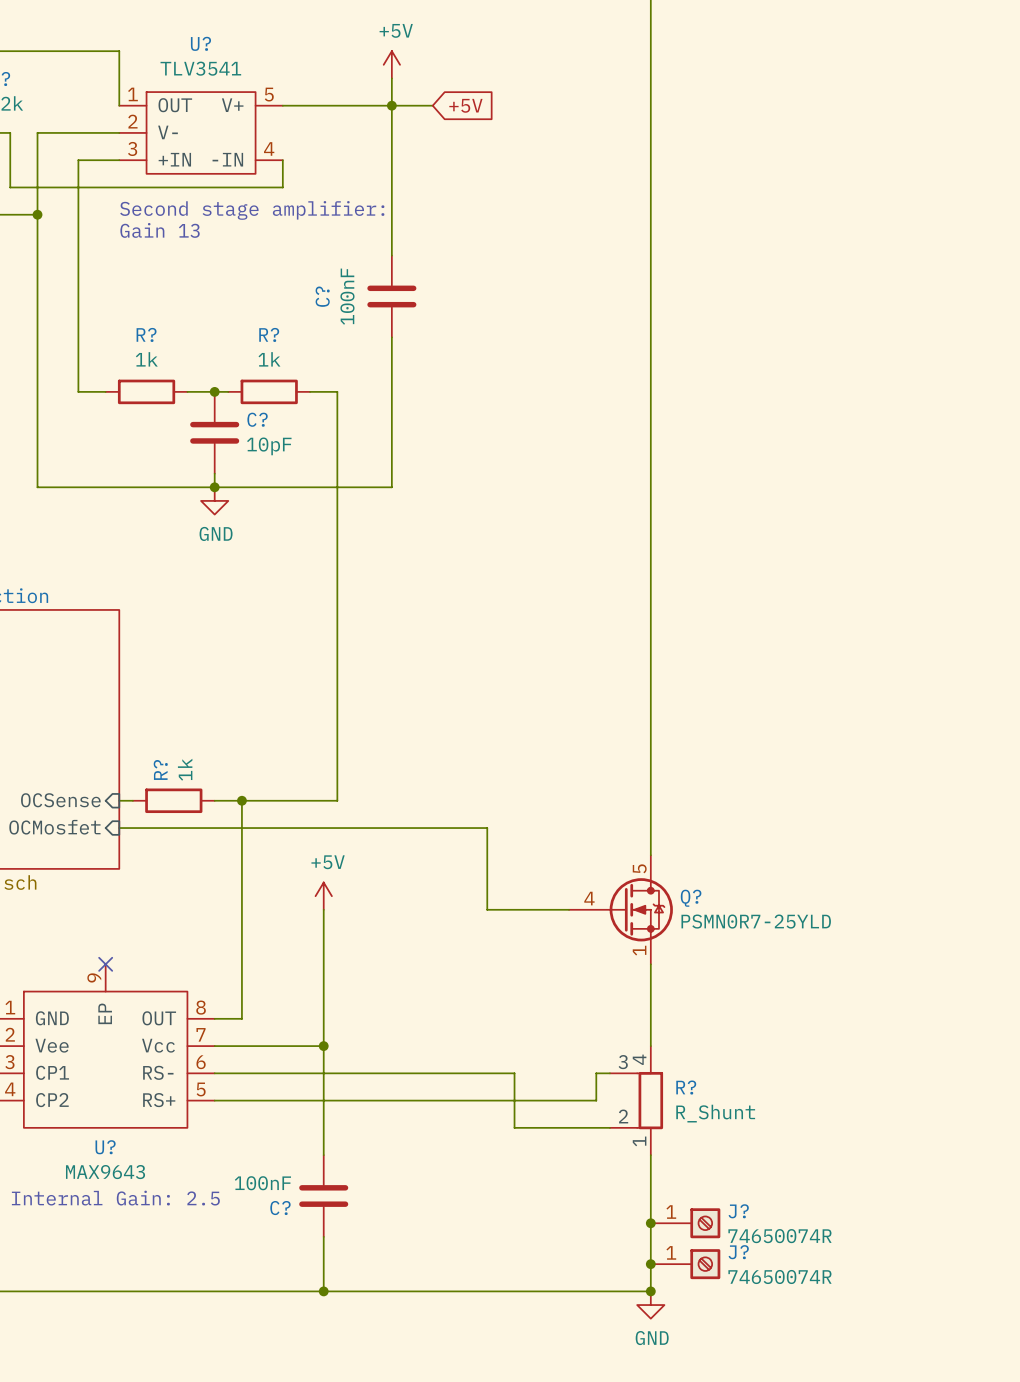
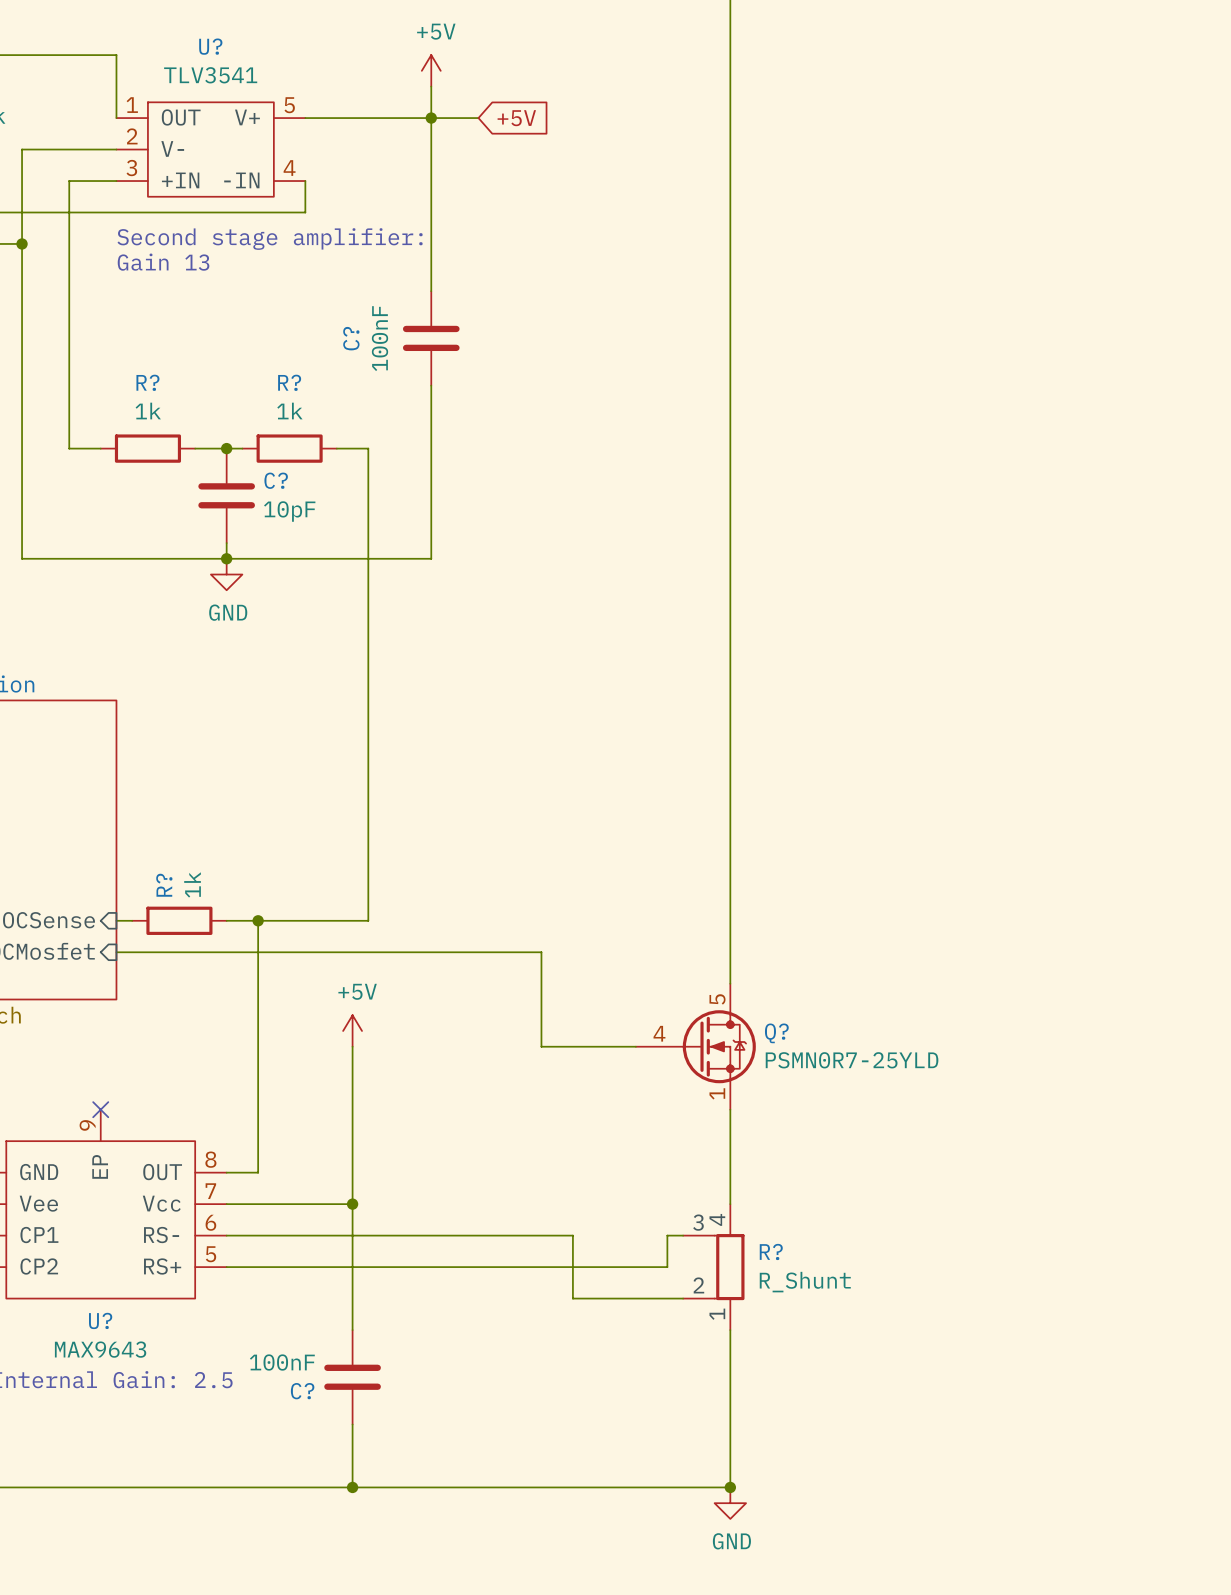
junction: (650, 1223) -> none
J?: 74650074R (685, 1223) -> none
junction: (650, 1264) -> none
J?: 74650074R (685, 1264) -> none

